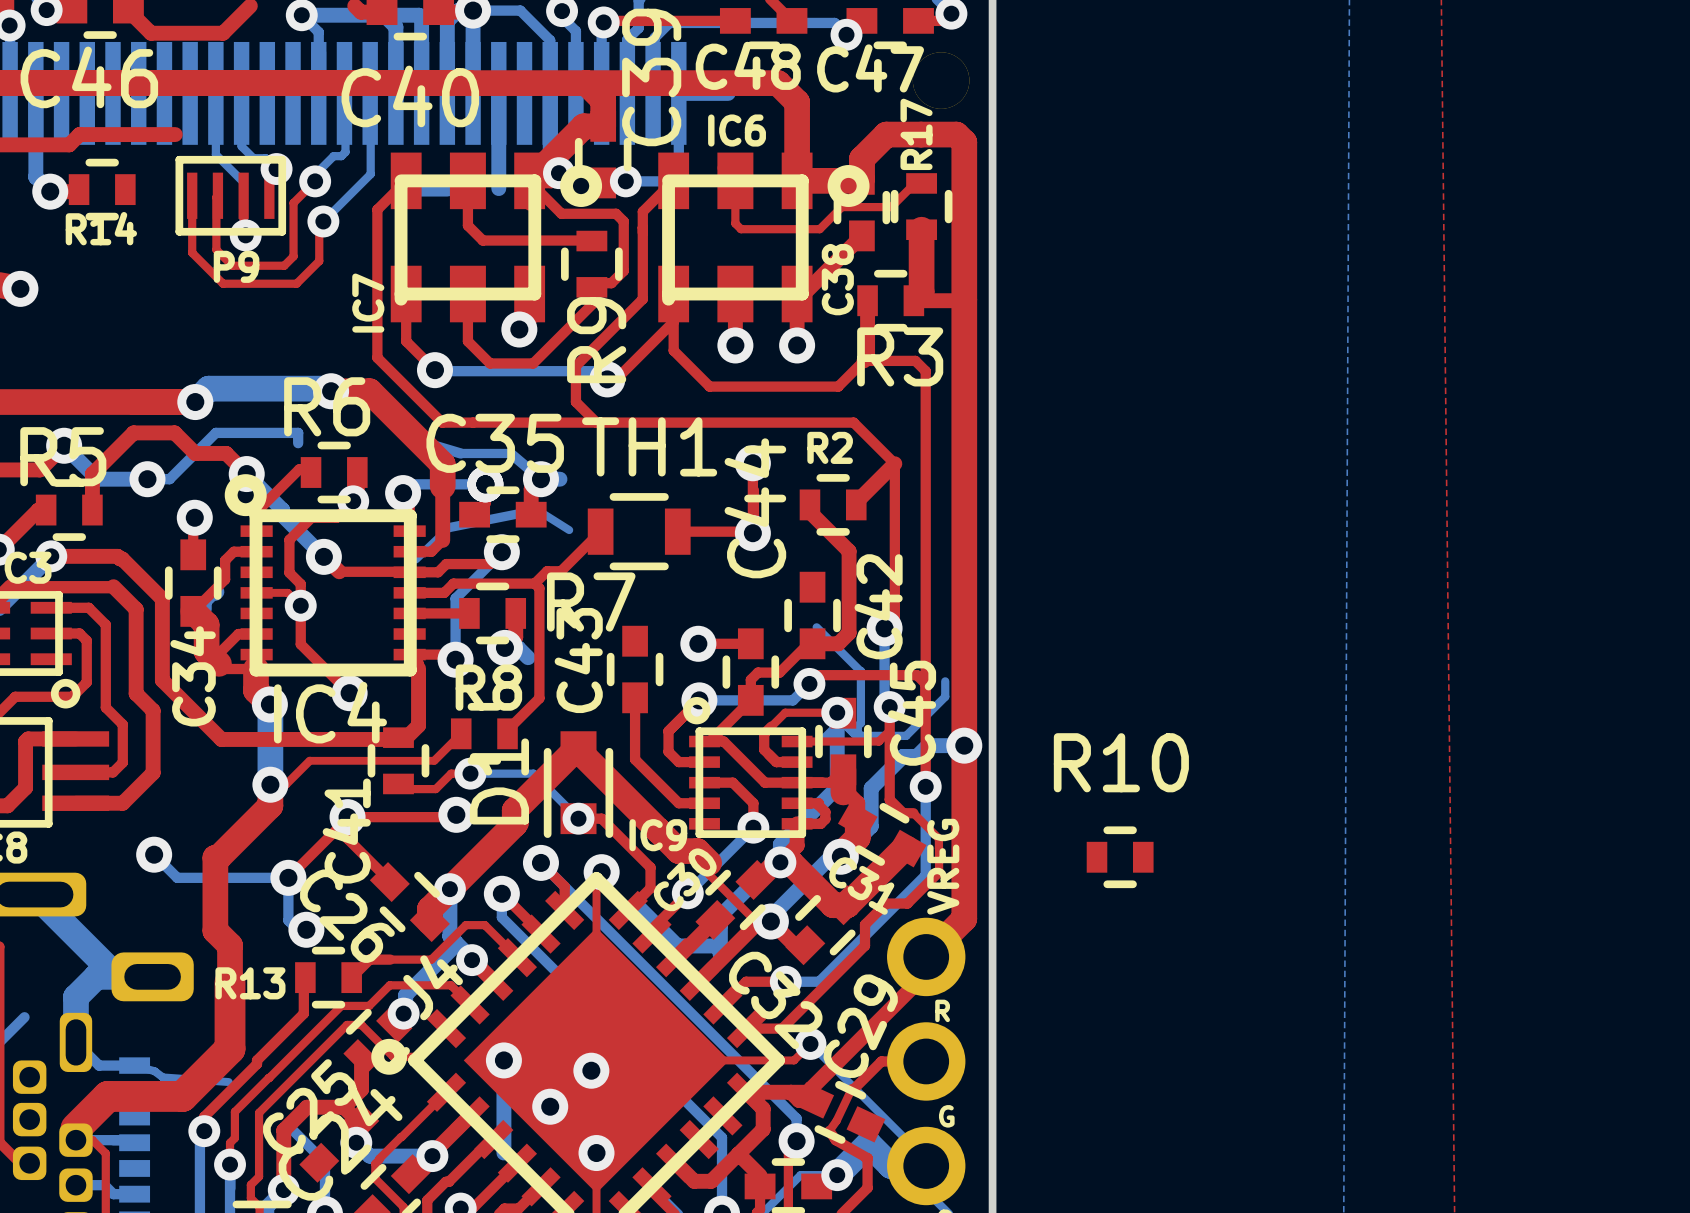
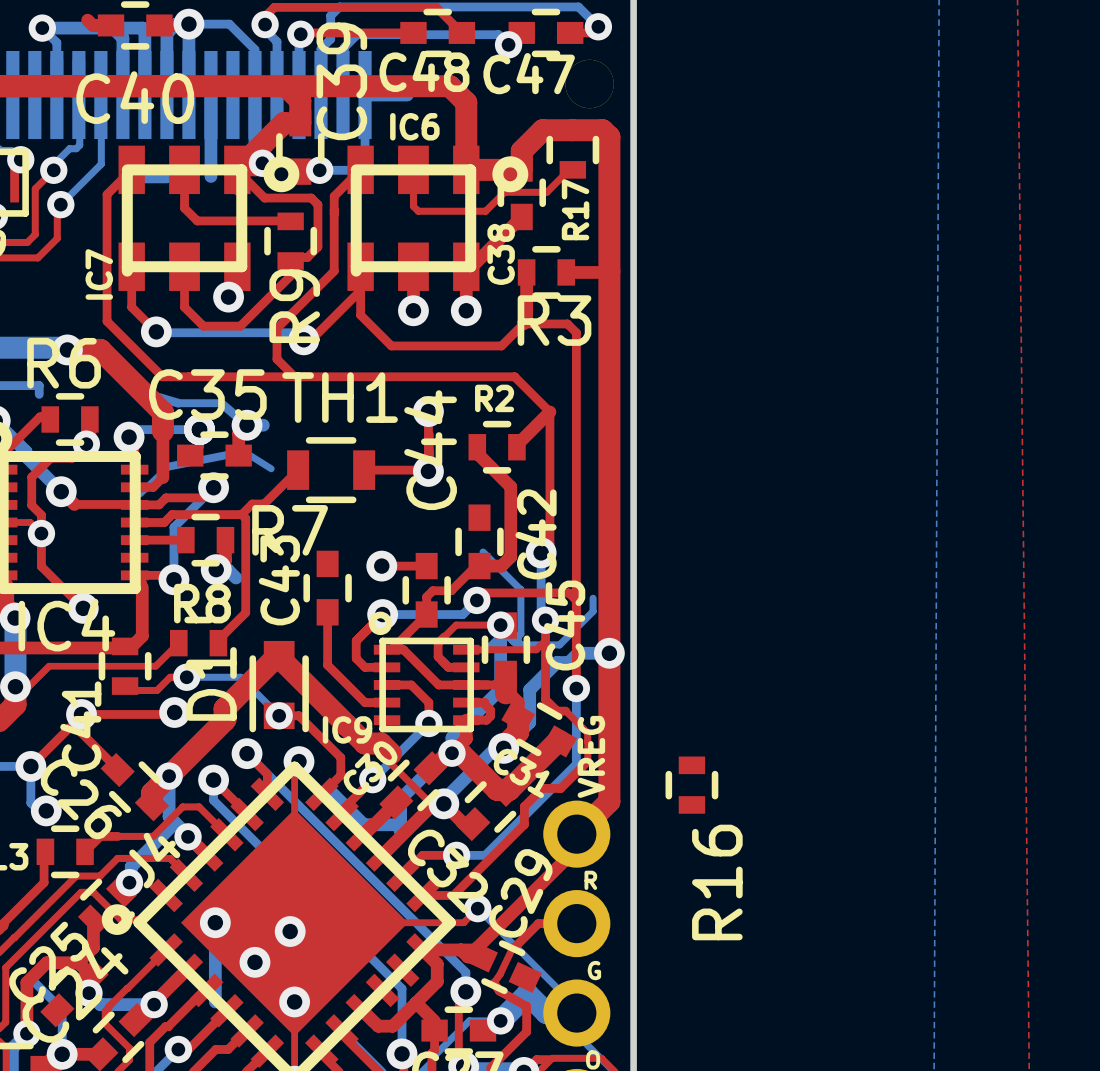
R17 name position: R17 (916, 134) -> R17 (575, 209)
R17 position: (921, 206) -> (572, 150)
top track: (921, 229) (921, 291) (917, 295) -> none
R10: (1120, 857) -> none
R16: none -> (691, 785)

